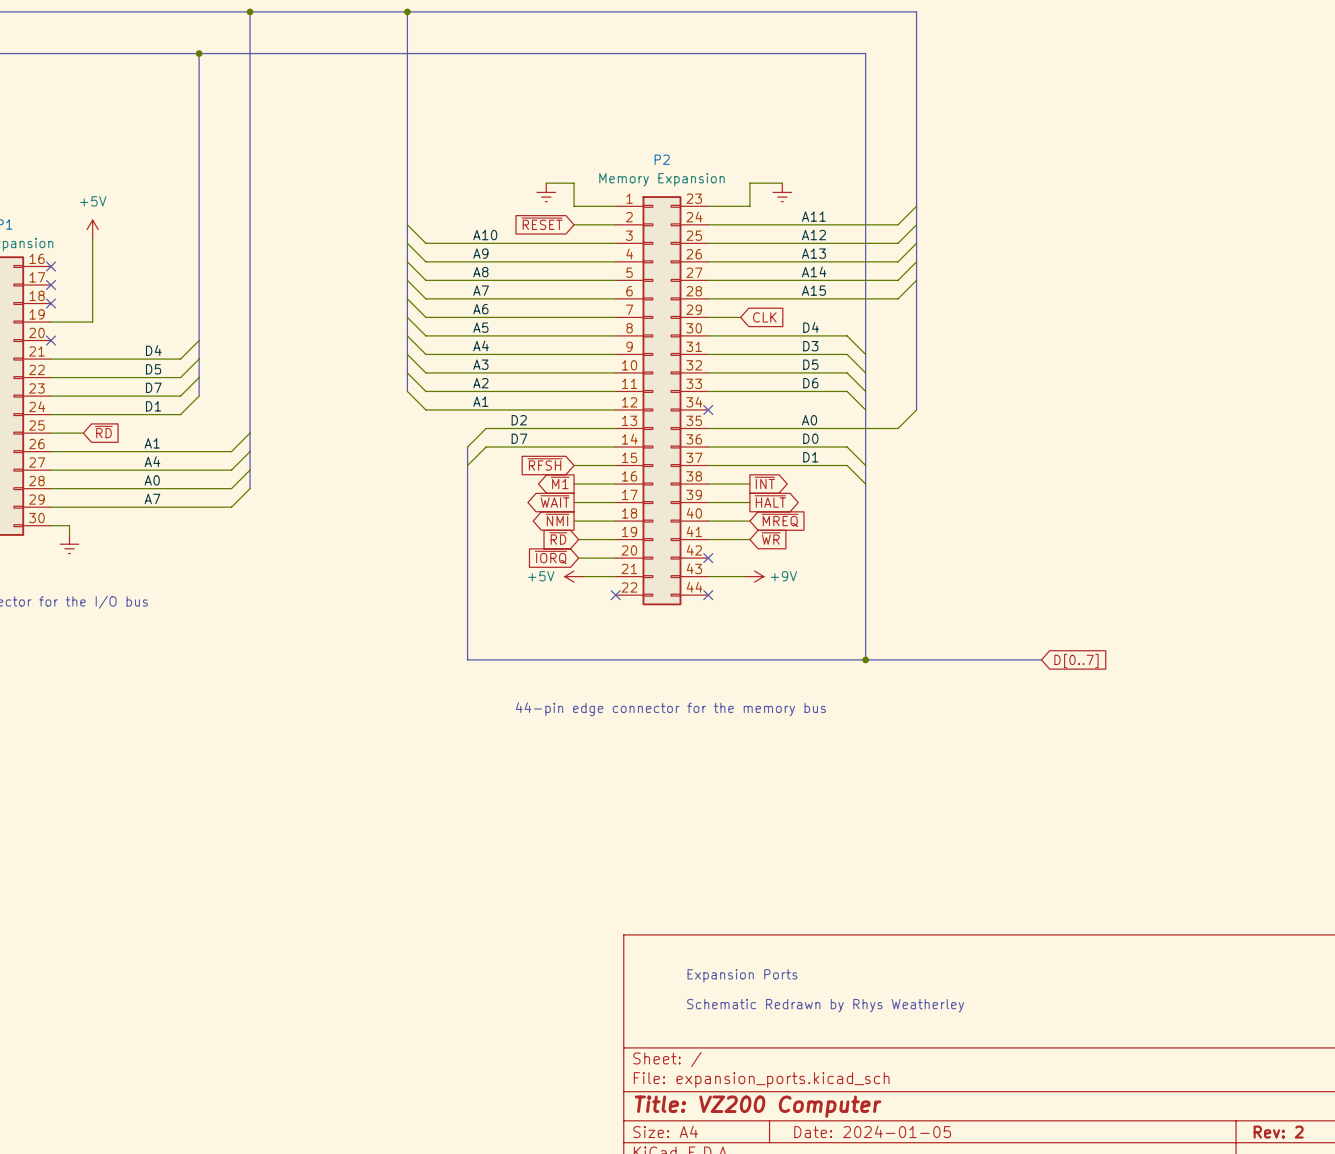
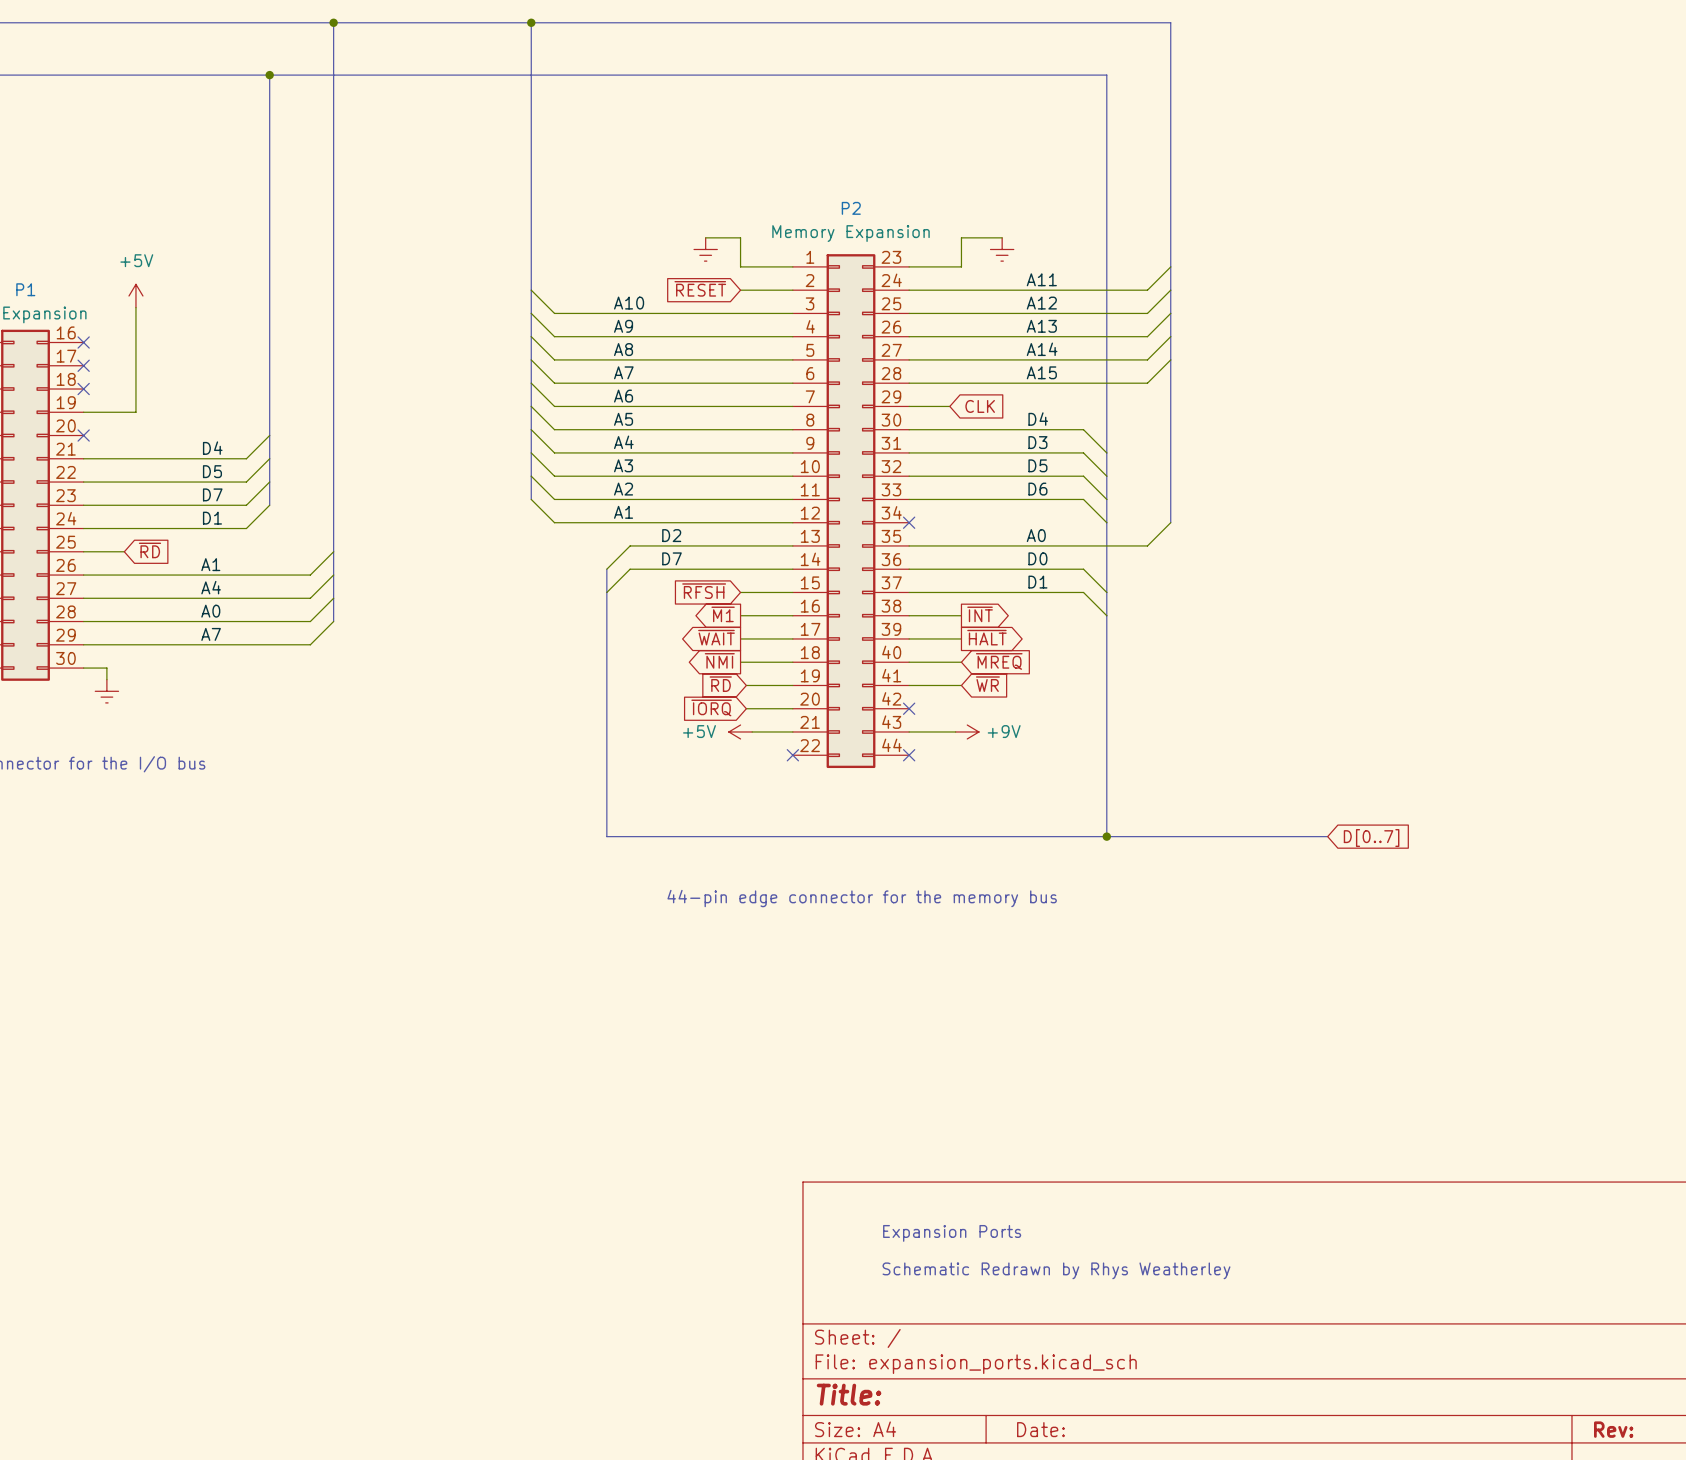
title block: Title: VZ200 Computer (758, 1106) -> Title: (849, 1394)
title block: Date: 2024-01-05 (872, 1131) -> Date: (1040, 1429)
title block: Rev: 2 (1278, 1132) -> Rev: (1613, 1429)

